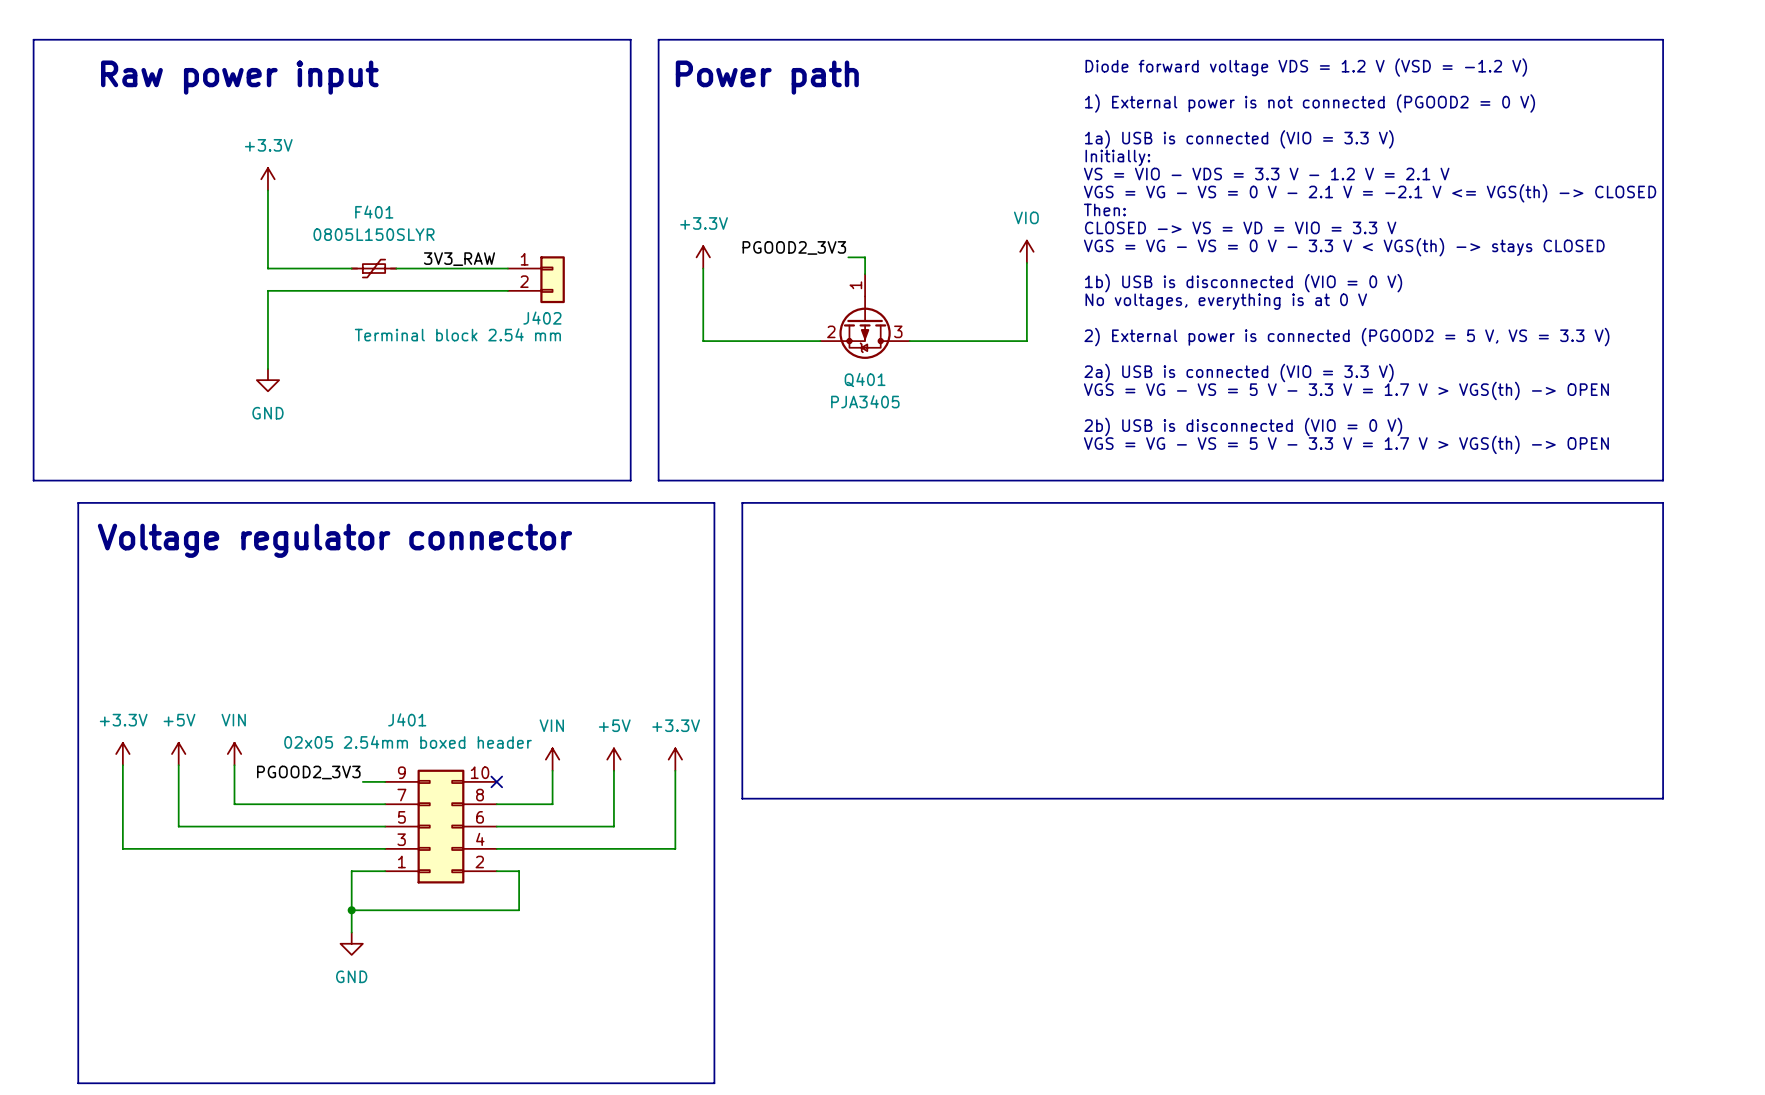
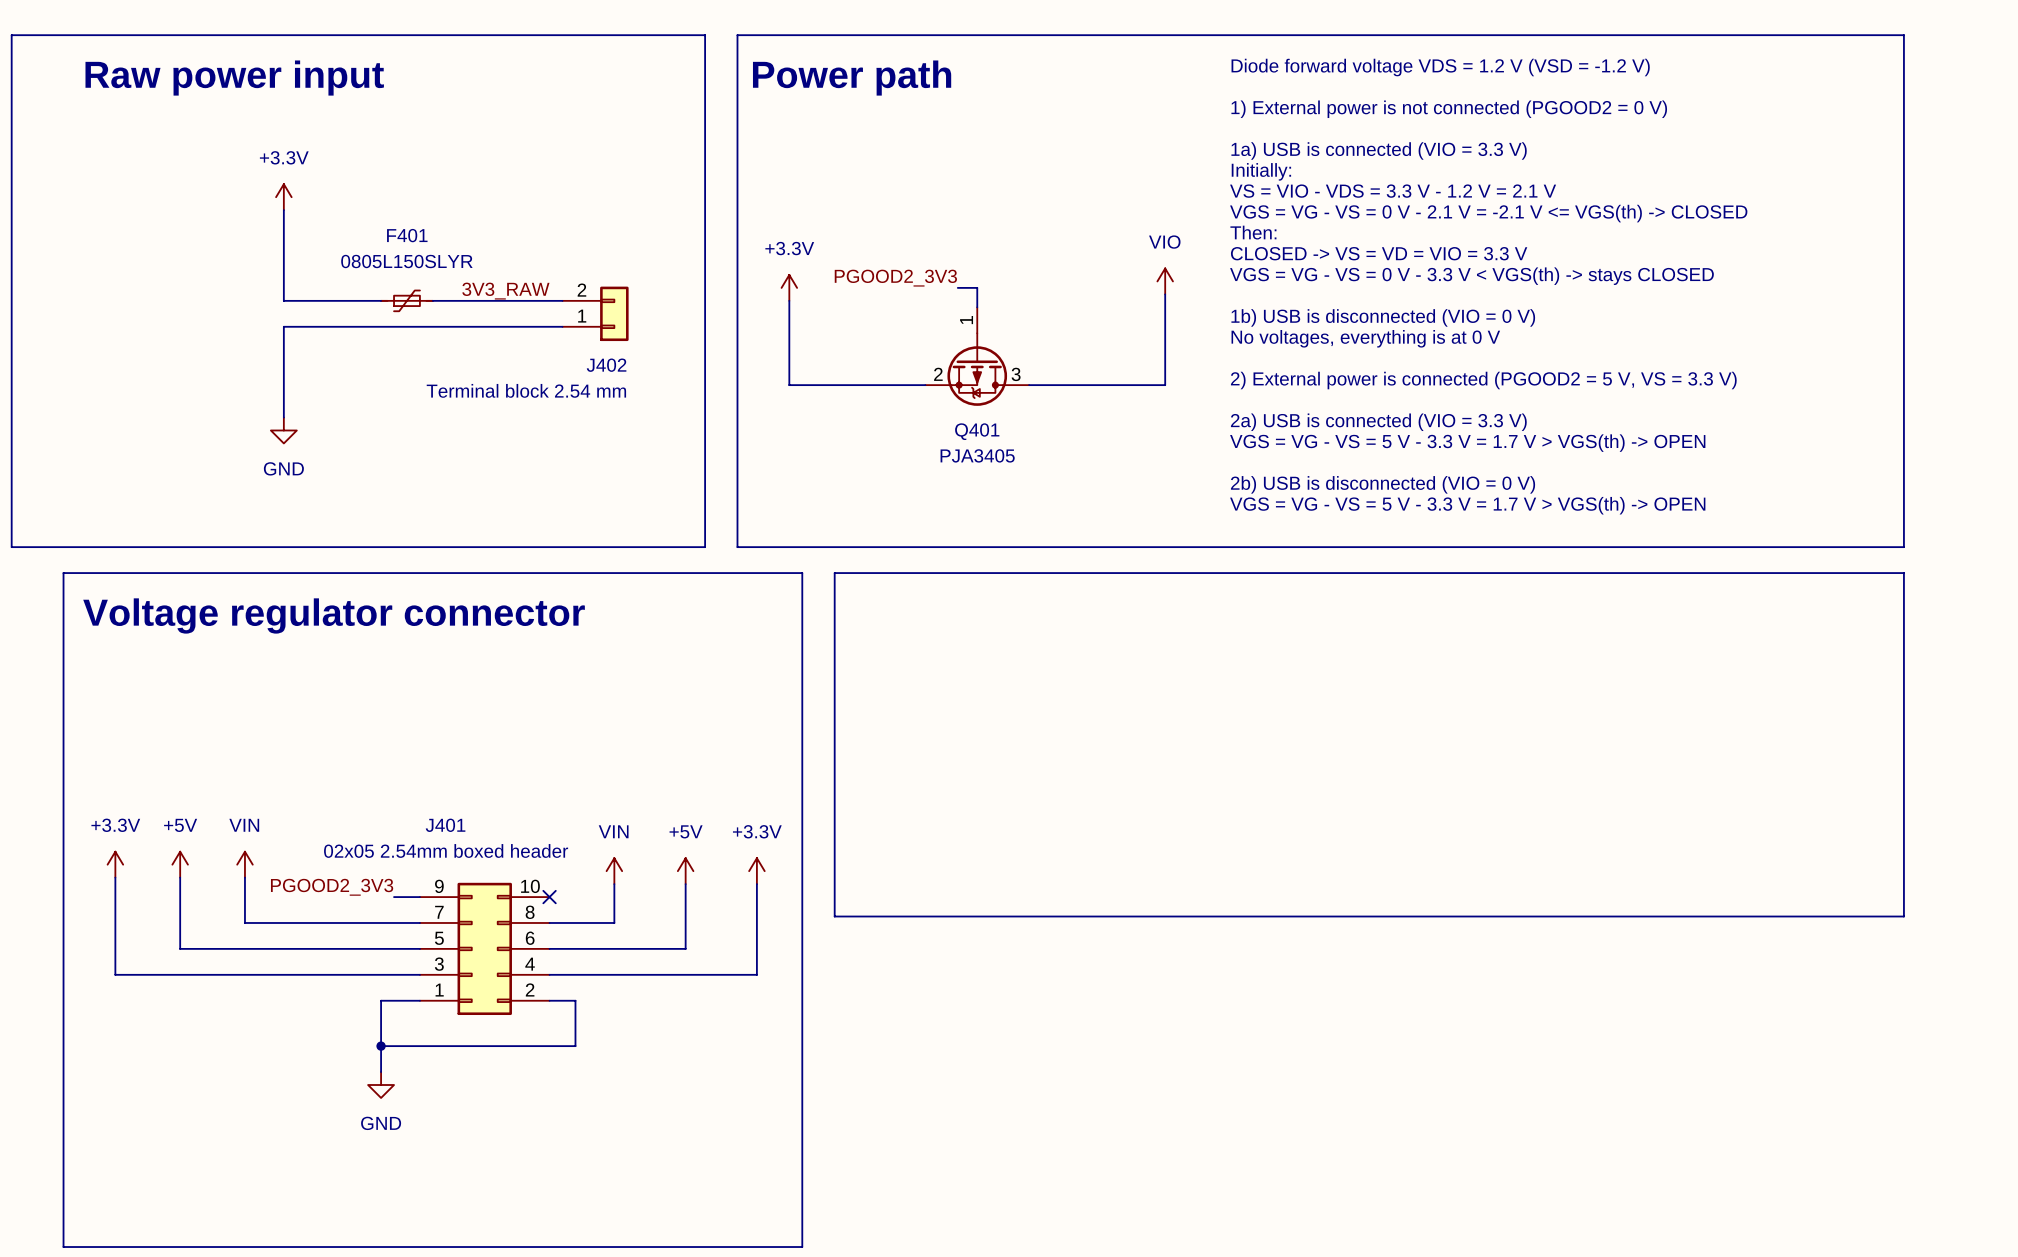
J402 flip: as is (552, 279) -> up-down (614, 313)

